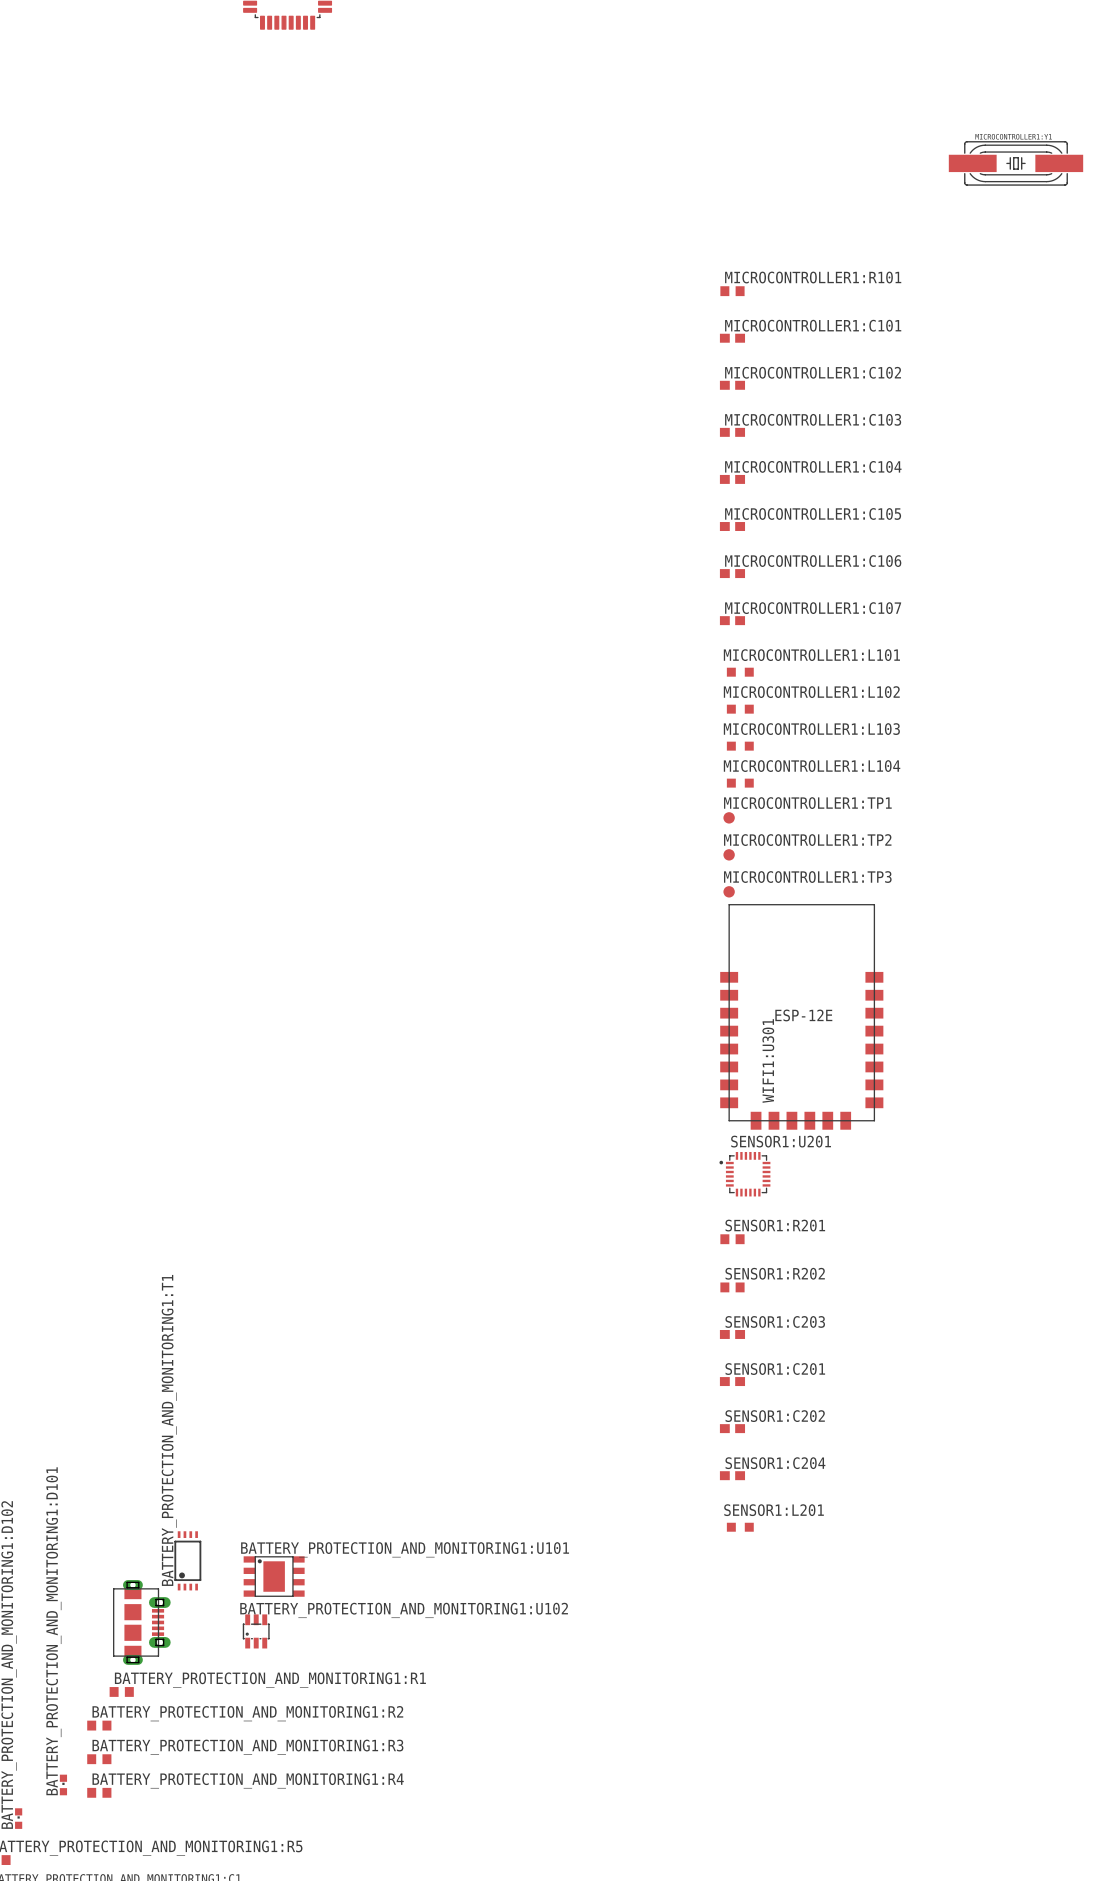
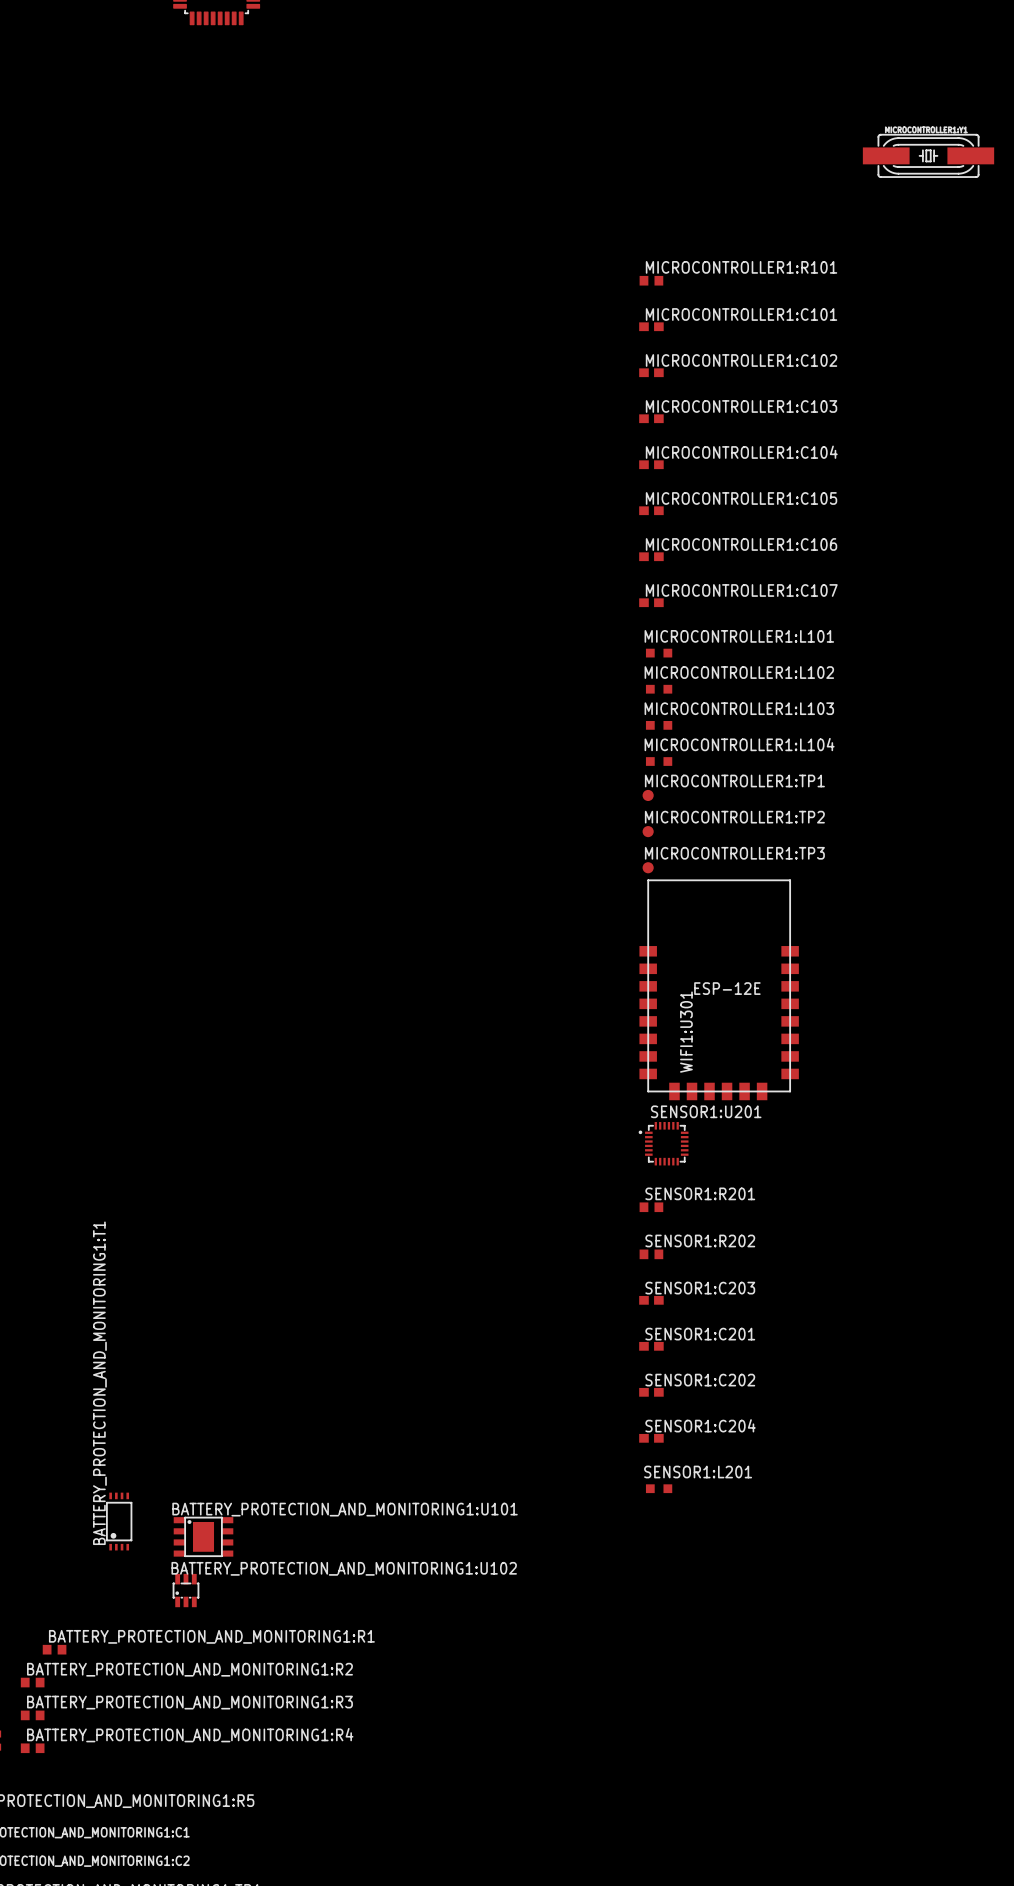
part: (142, 1622) -> none

